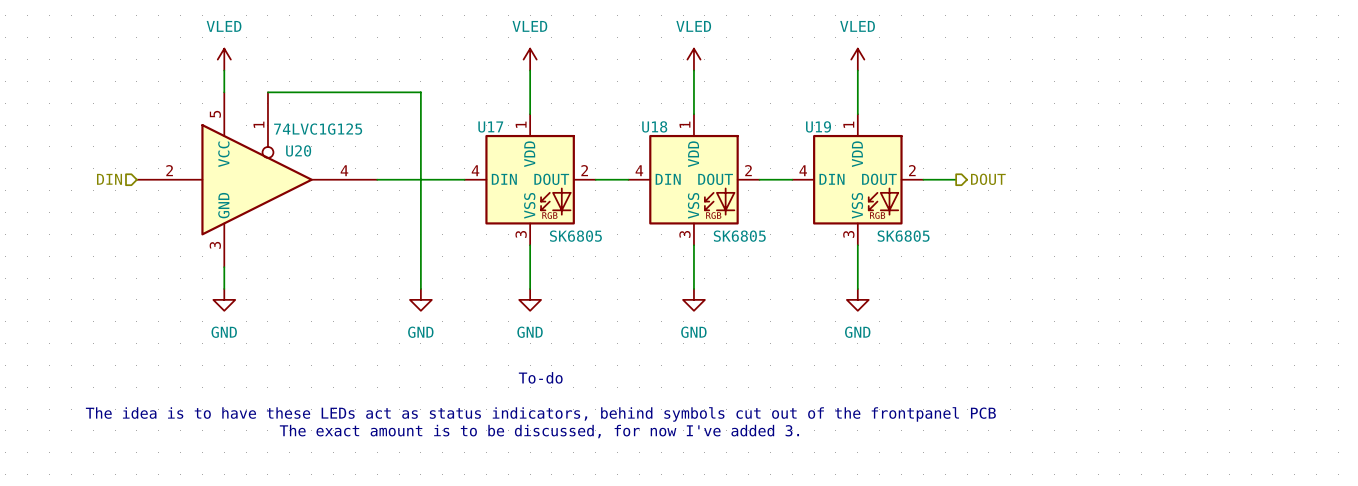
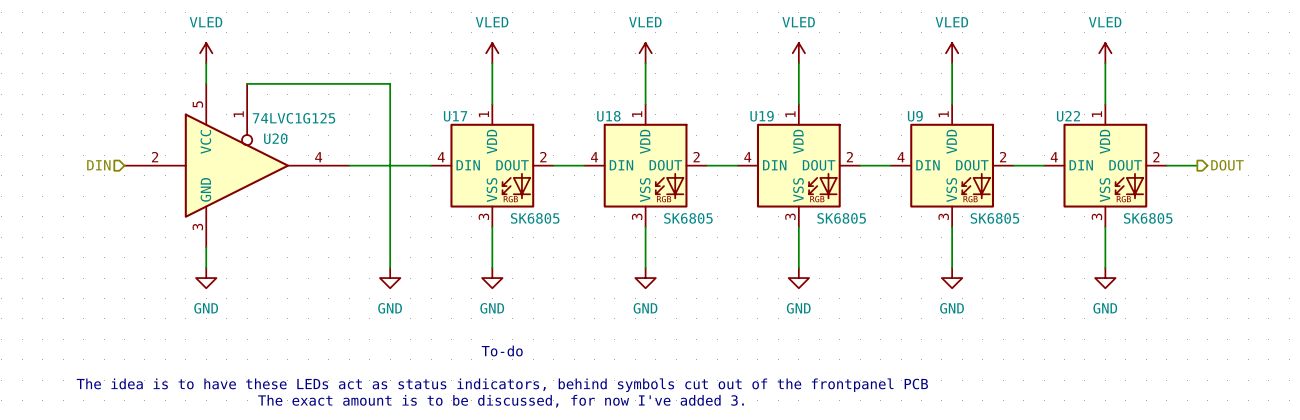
power symbol: none -> VLED (952, 53)
power symbol: none -> VLED (1105, 53)
wire: none -> (952, 63) (952, 104)
wire: none -> (1105, 63) (1105, 104)
hierarchical label: DOUT (988, 179) -> none
U9: none -> SK6805 (952, 165)
wire: none -> (1013, 165) (1044, 165)
U22: none -> SK6805 (1105, 165)
wire: none -> (1166, 165) (1197, 165)
hierarchical label: none -> DOUT (1227, 165)
wire: none -> (952, 226) (952, 267)
wire: none -> (1105, 226) (1105, 267)
power symbol: none -> GND (952, 278)
power symbol: none -> GND (1105, 278)

